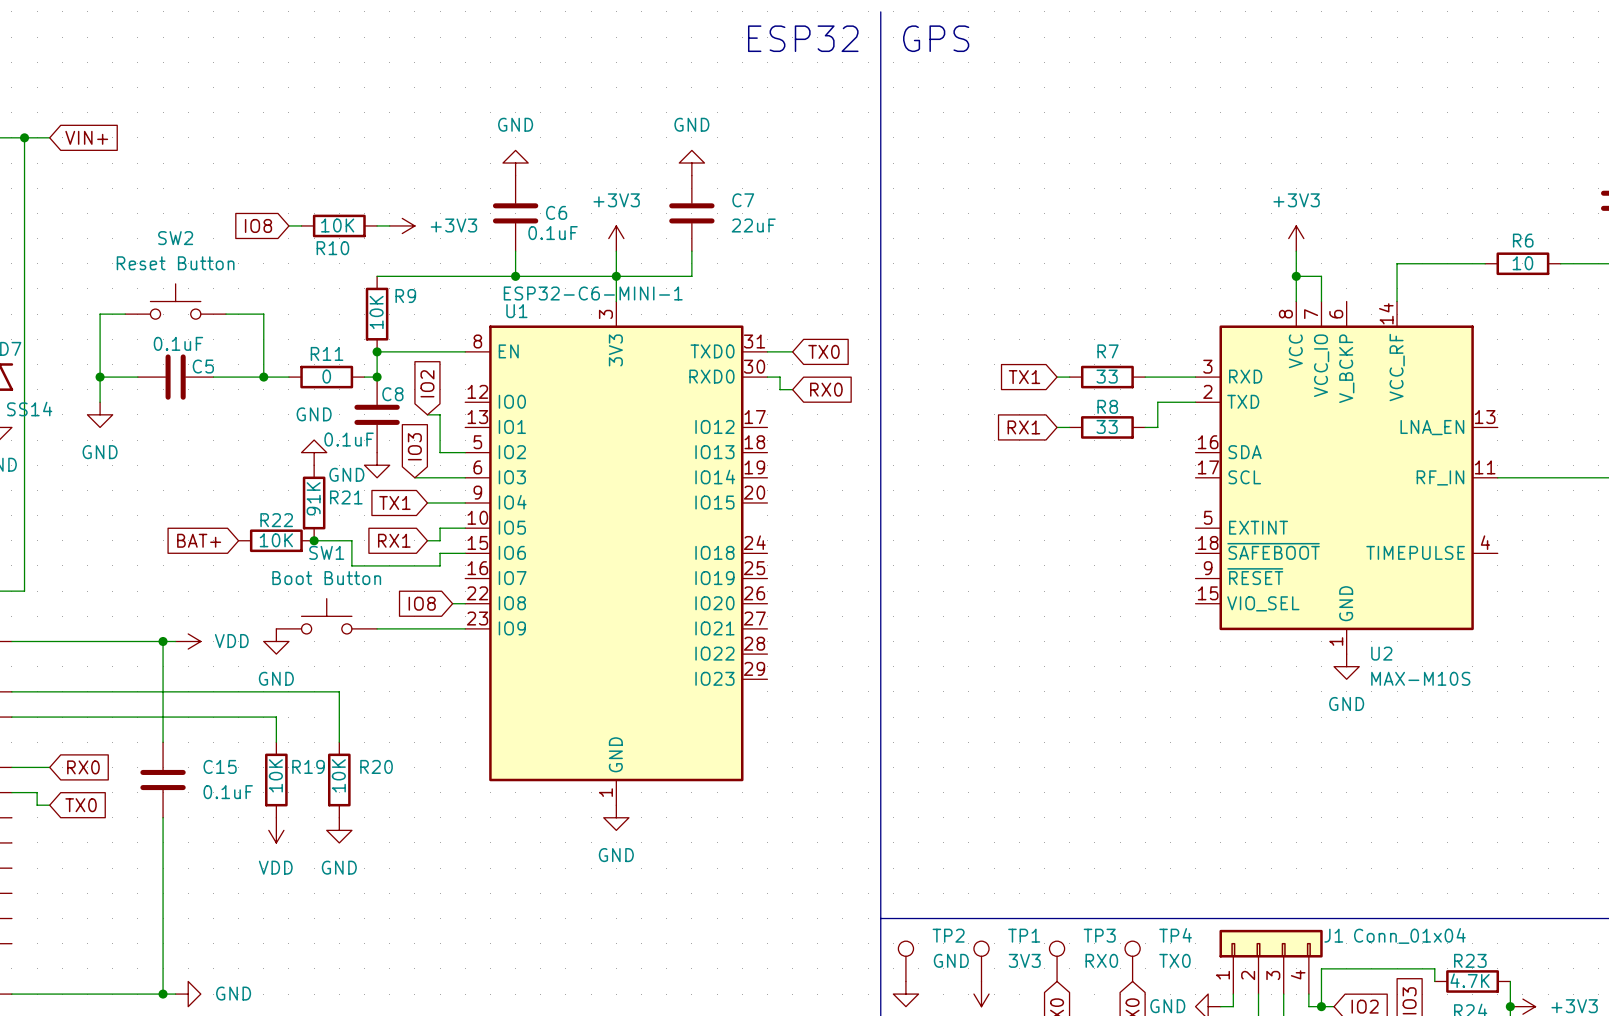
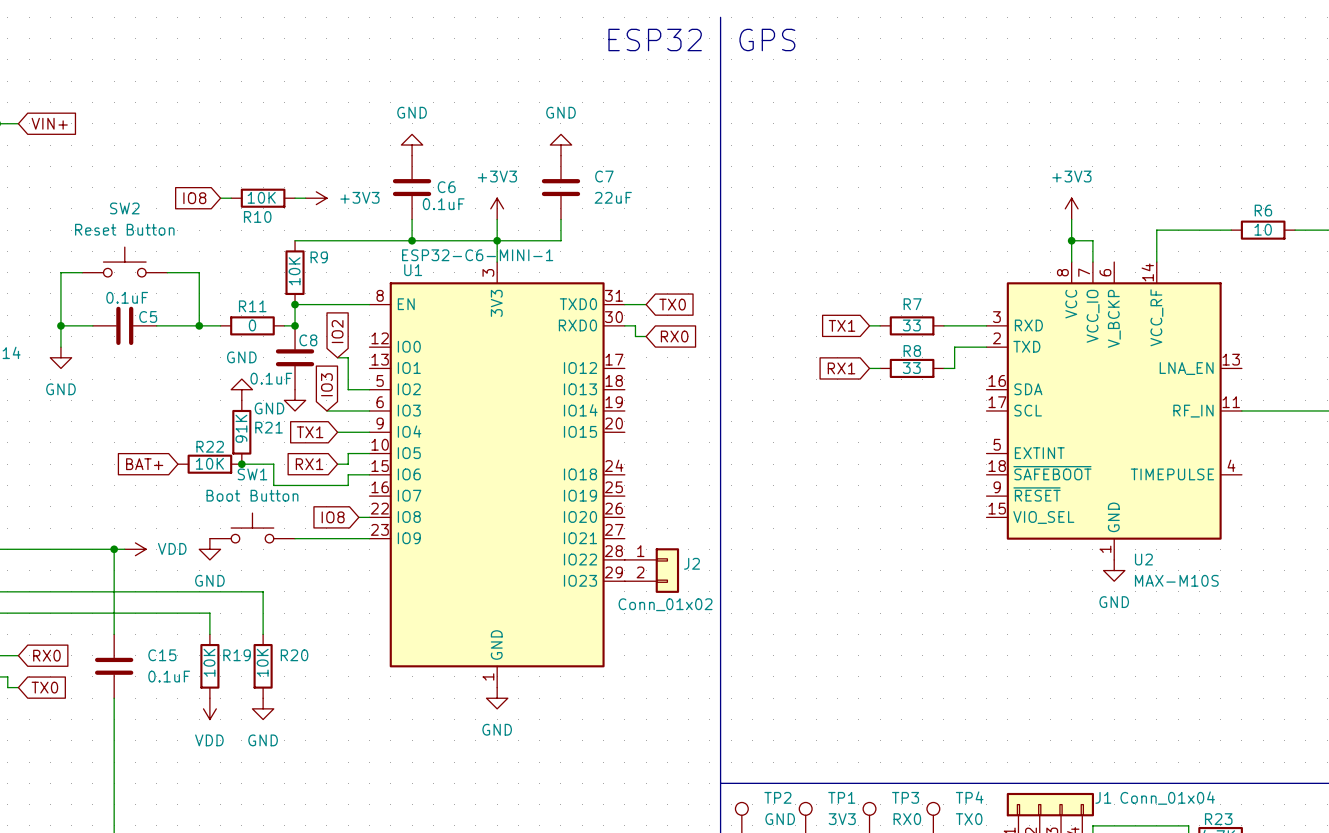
J2: none -> Conn_01x02 (651, 570)

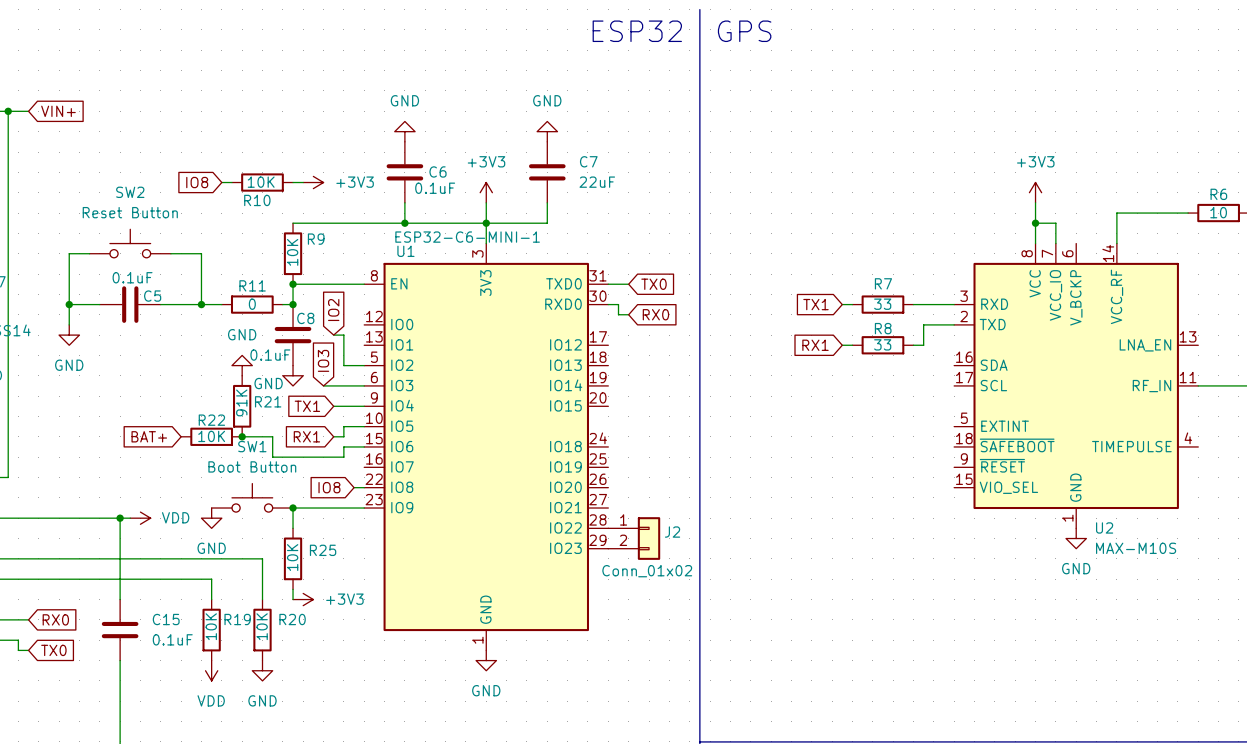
wire: none -> (293, 508) (293, 528)
junction: none -> (293, 508)
R25: none -> 10K (293, 558)
wire: none -> (293, 589) (293, 599)
power symbol: none -> +3V3 (303, 599)

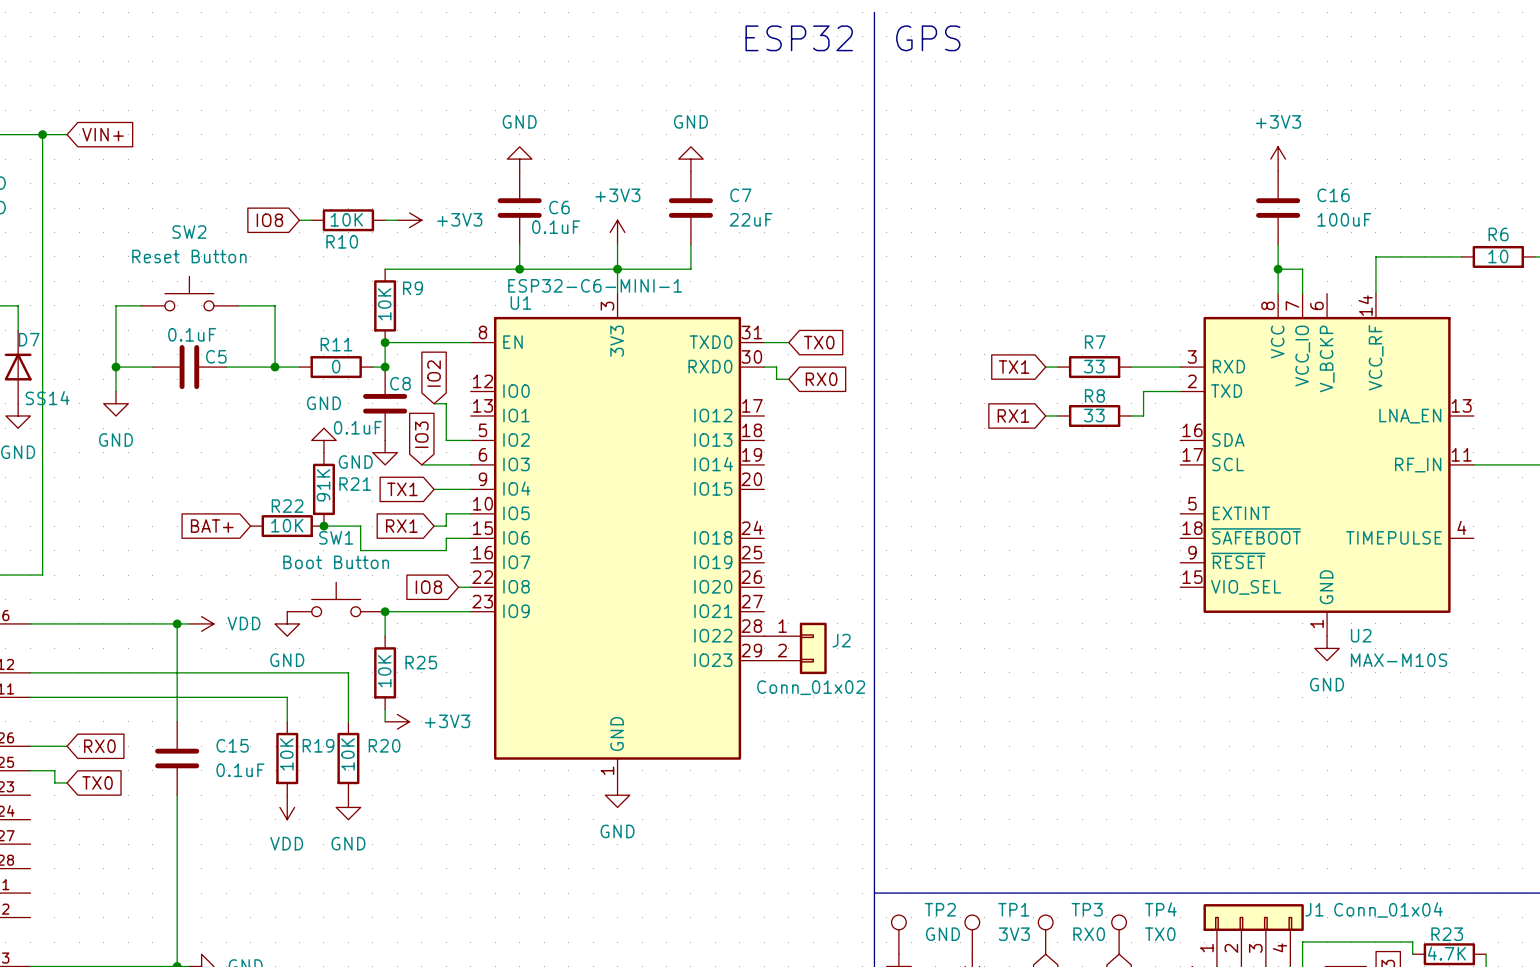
C16: none -> 100uF (1278, 208)
power symbol position: +3V3 (1035, 192) -> +3V3 (1278, 159)

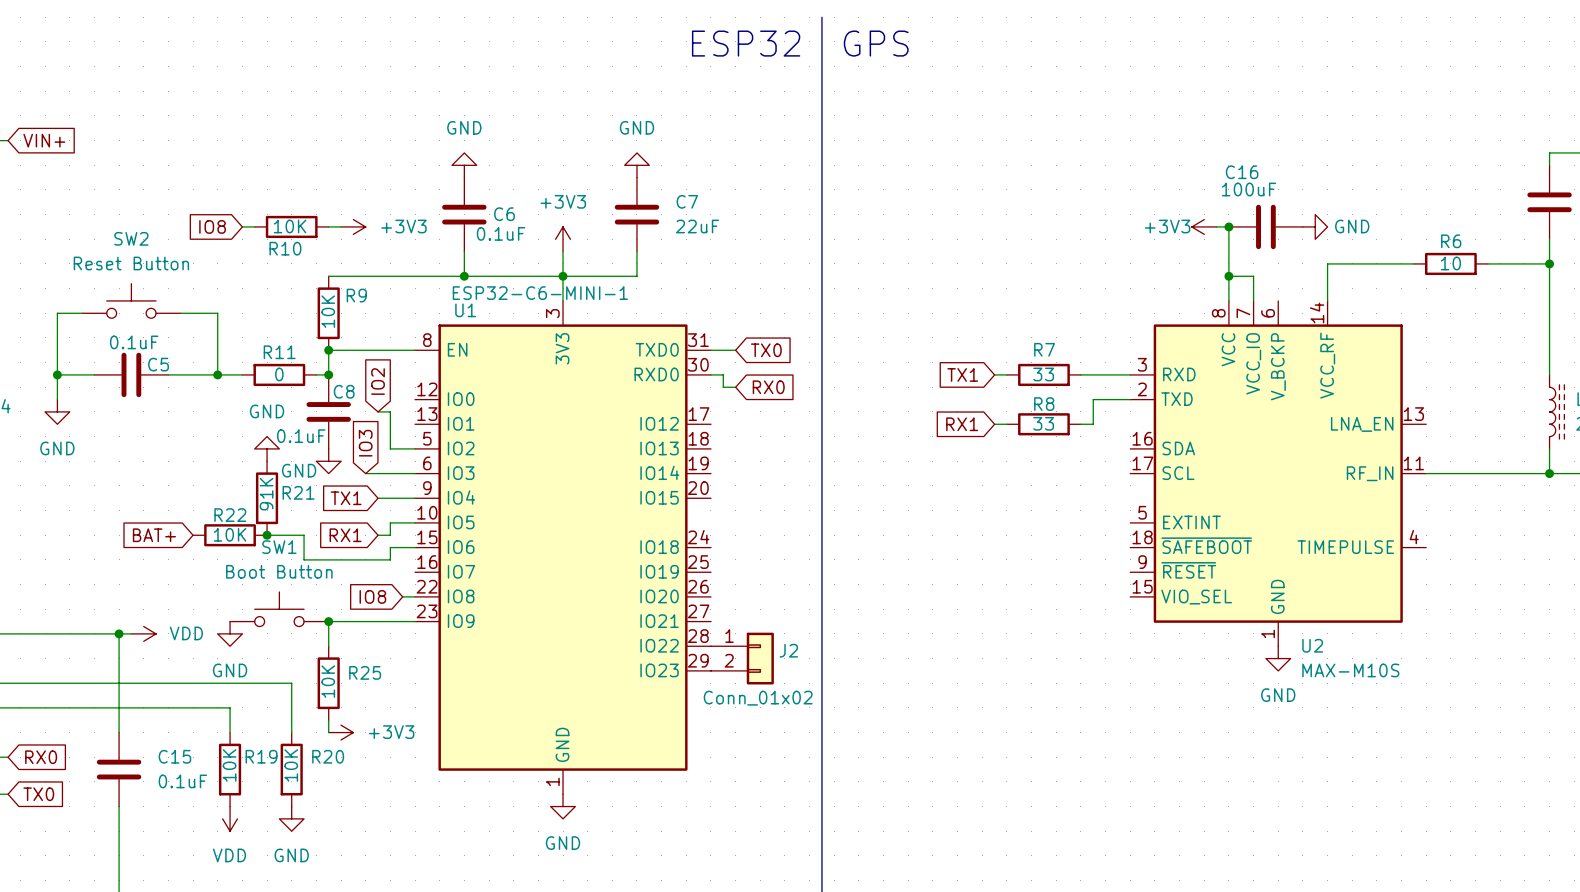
power symbol rotation: 0° (1278, 159) -> 90° counterclockwise (1204, 226)
power symbol position: +3V3 (1278, 159) -> +3V3 (1204, 226)
C16 name position: C16 (1333, 195) -> C16 (1242, 172)
C16 rotation: 0° (1278, 208) -> 90° clockwise (1265, 226)
C16 value position: 100uF (1344, 219) -> 100uF (1249, 189)
junction: none -> (1228, 226)
power symbol: none -> GND (1315, 226)

